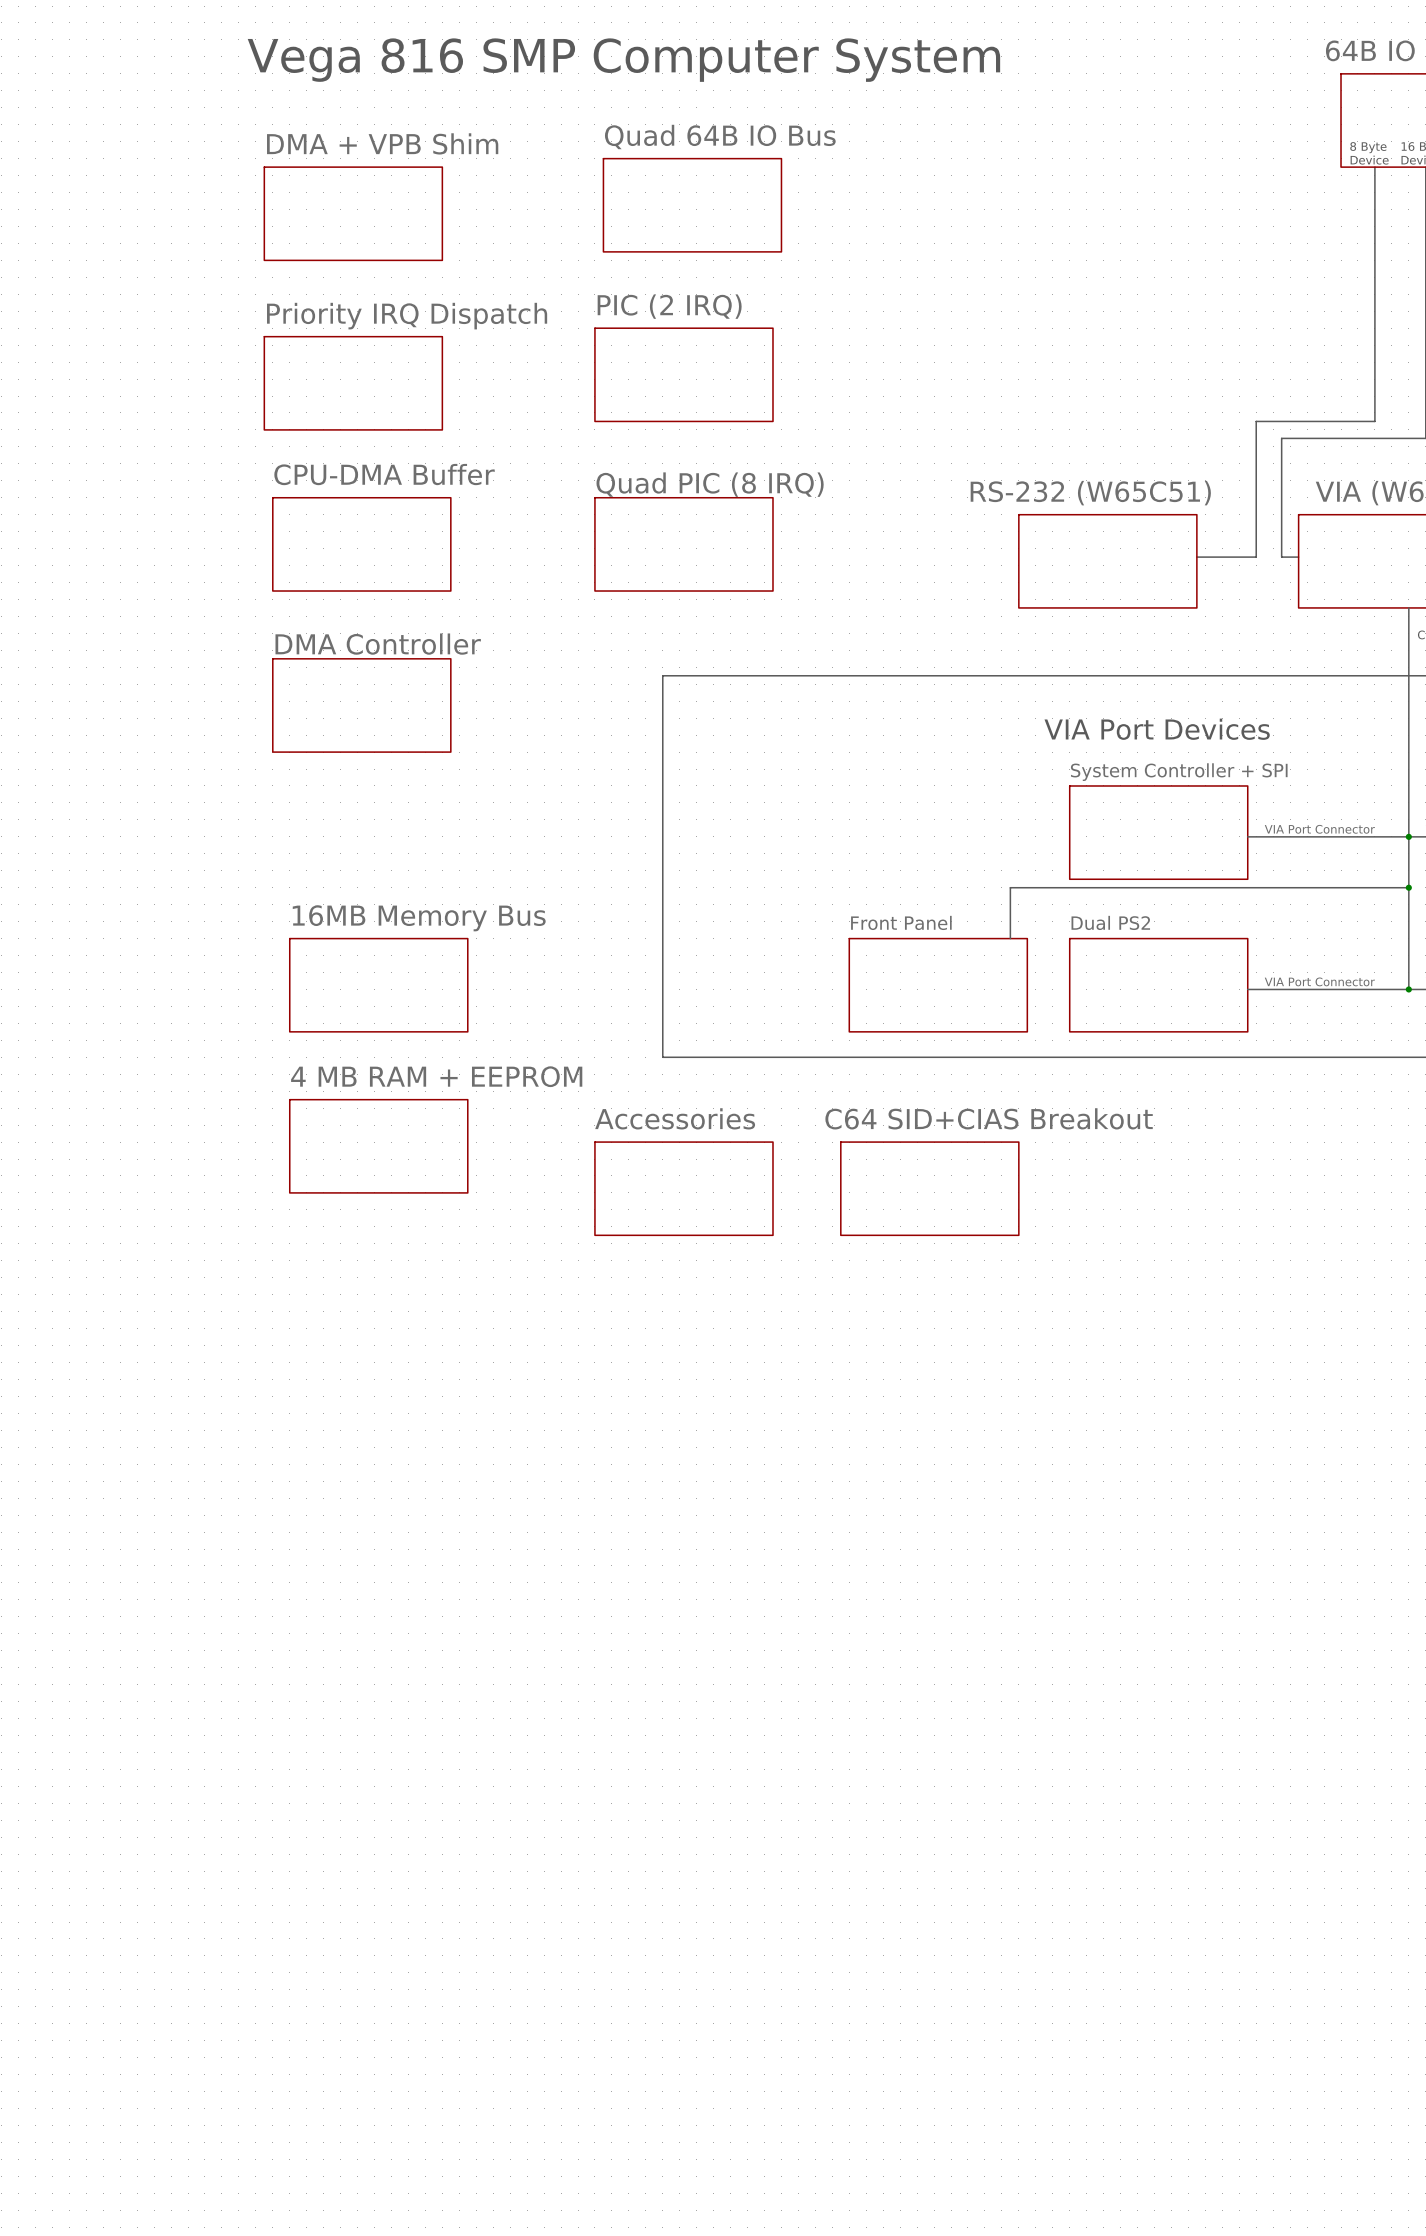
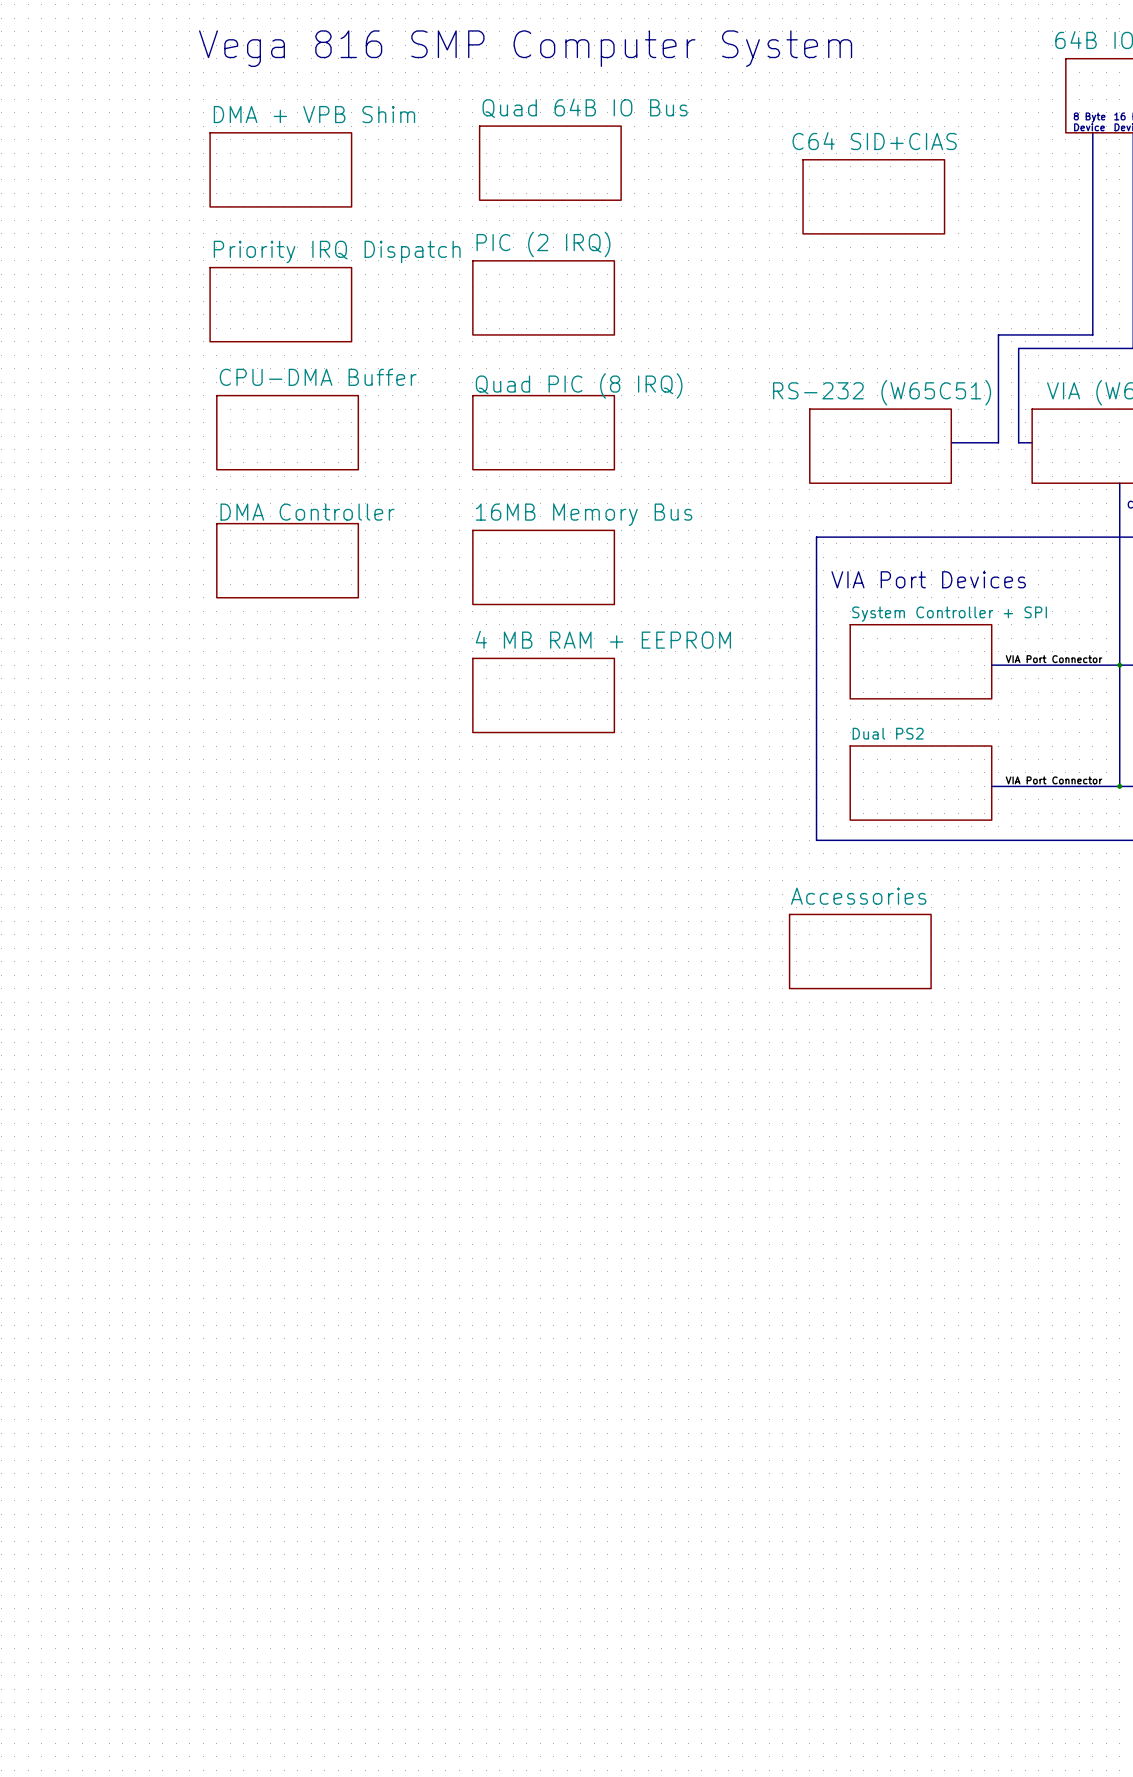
sheet C64 SID+CIAS: none -> (873, 196)
line: (1027, 675) (662, 675) (662, 1057) (1027, 1057) -> (816, 537) (816, 840)
bus: (1408, 887) (1010, 887) (1010, 938) -> none
junction: (1408, 887) -> none
sheet 16MB Memory Bus position: (378, 985) -> (543, 567)
sheet Front Panel: (938, 985) -> none
sheet 4 MB RAM + EEPROM position: (378, 1146) -> (543, 695)
sheet Accessories: (683, 1188) -> none
sheet C64 SID+CIAS Breakout: (929, 1188) -> none
sheet Accessories: none -> (860, 951)

